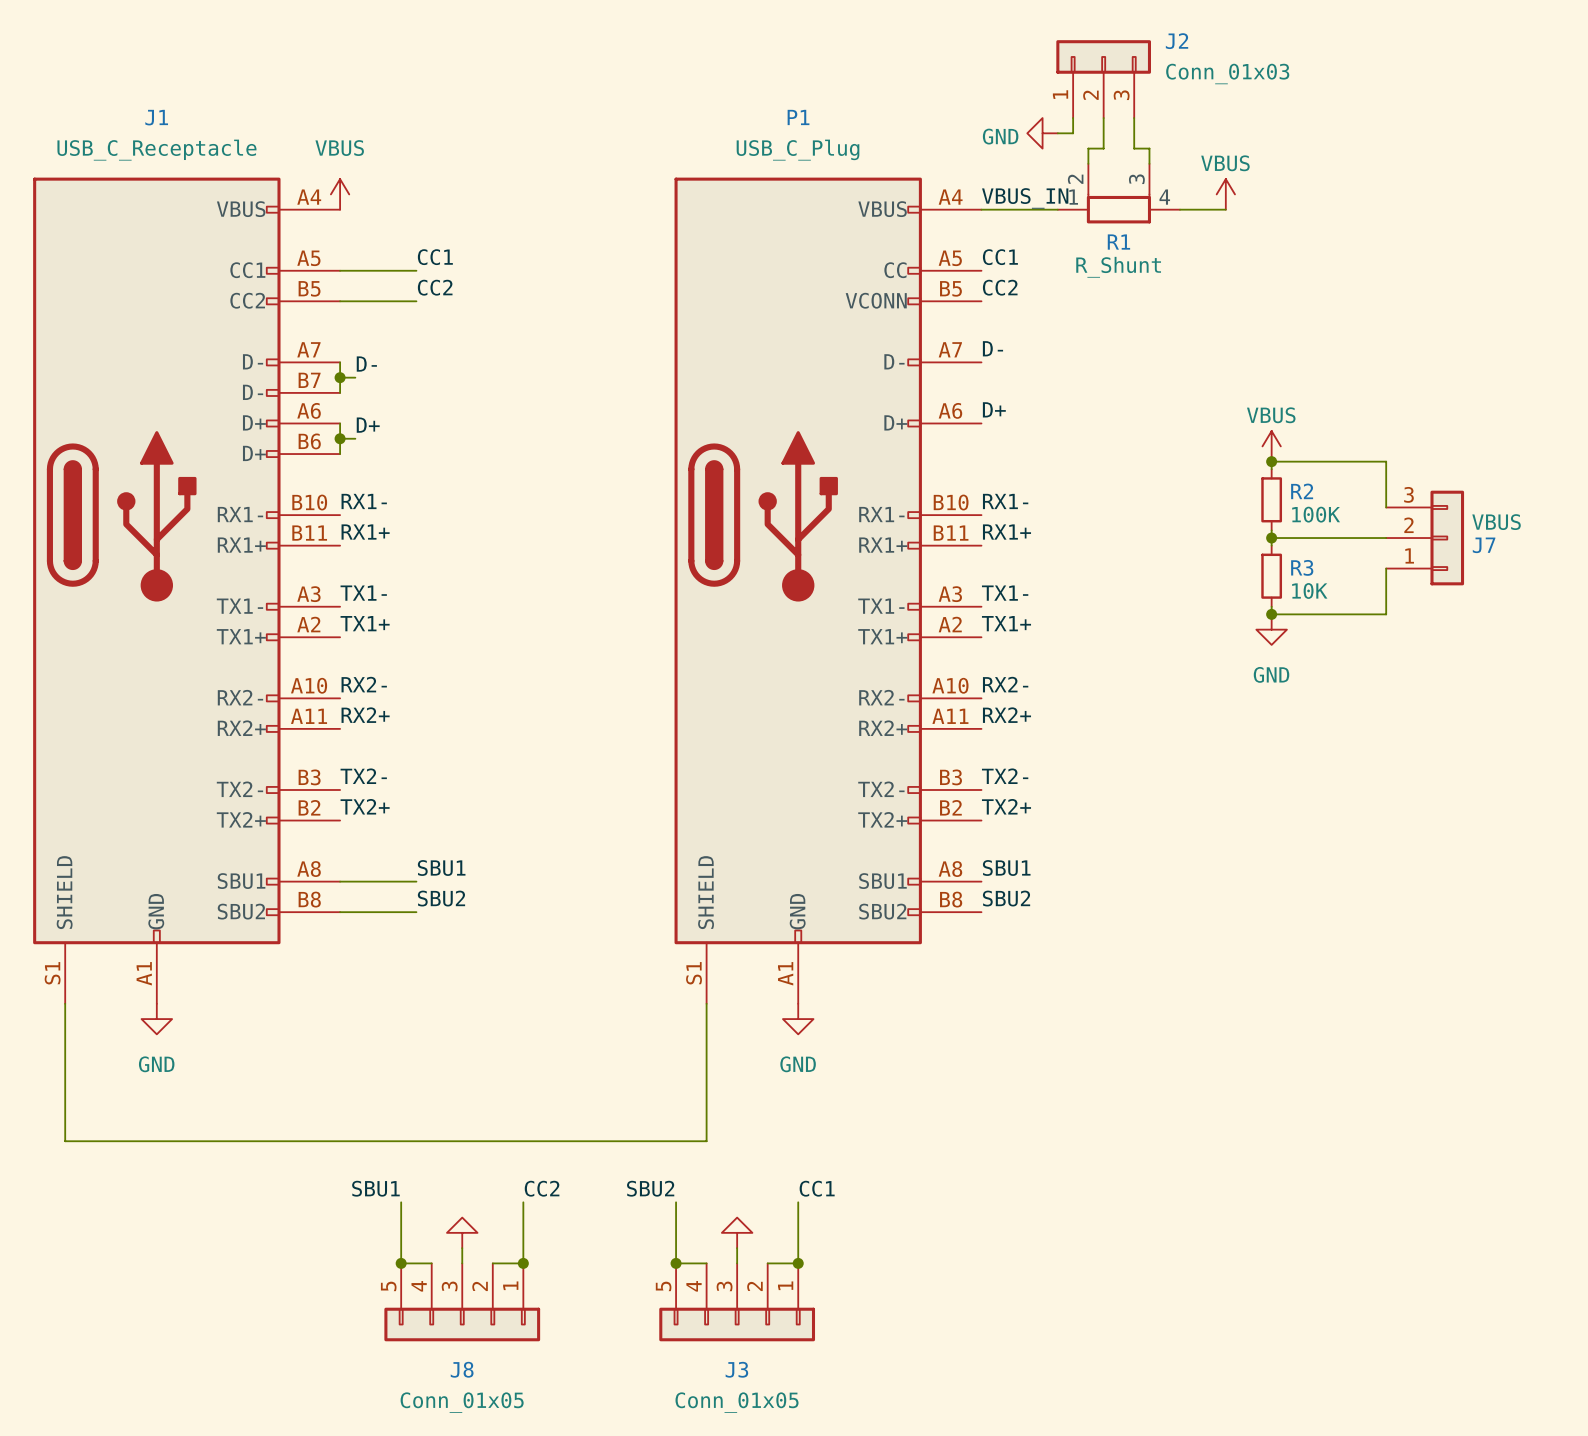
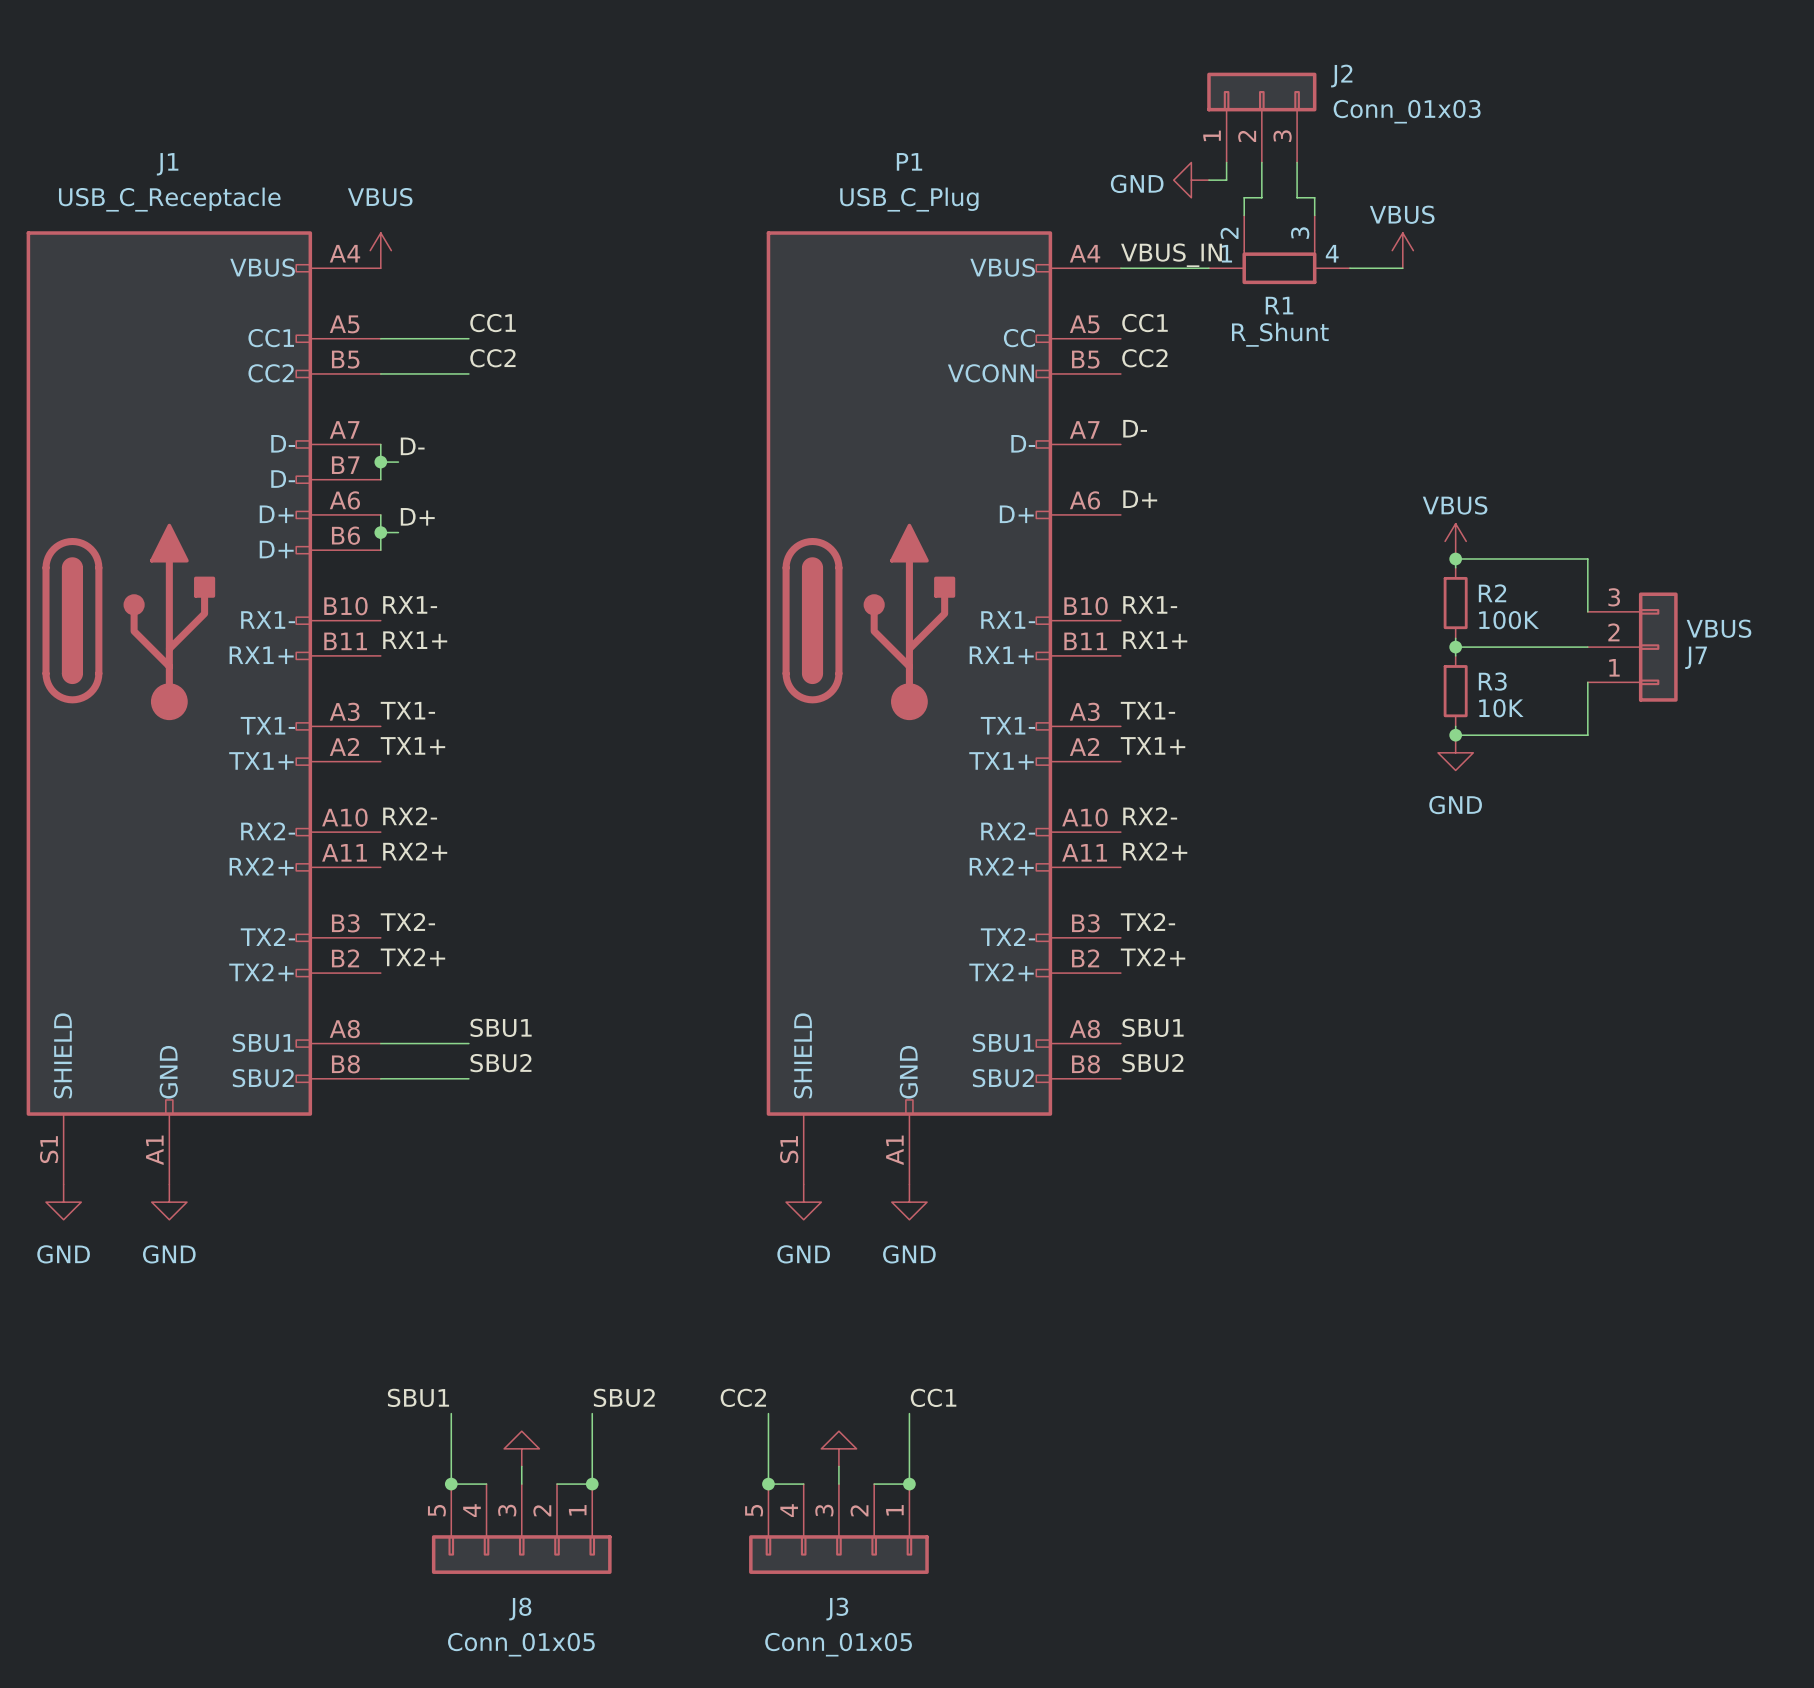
wire: (65, 1003) (65, 1141) (706, 1141) (706, 1003) -> none
power symbol: none -> GND (63, 1202)
power symbol: none -> GND (803, 1202)
label: CC2 (542, 1188) -> SBU2 (624, 1397)
label: SBU2 (650, 1188) -> CC2 (743, 1397)

